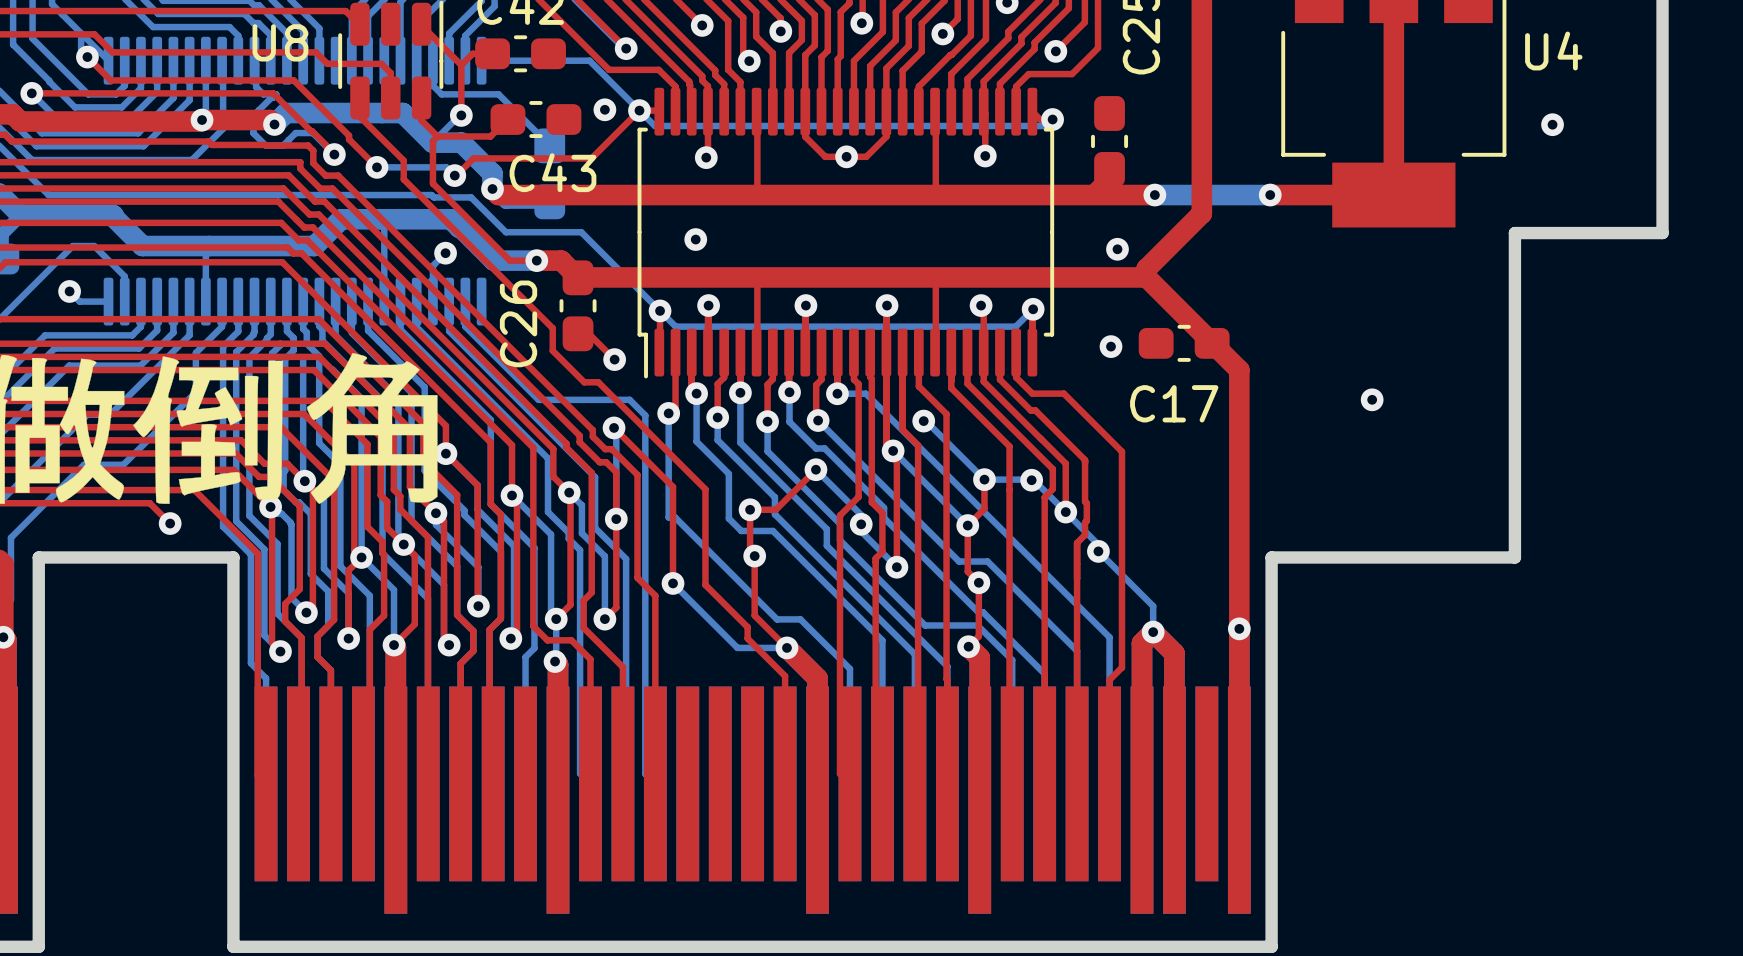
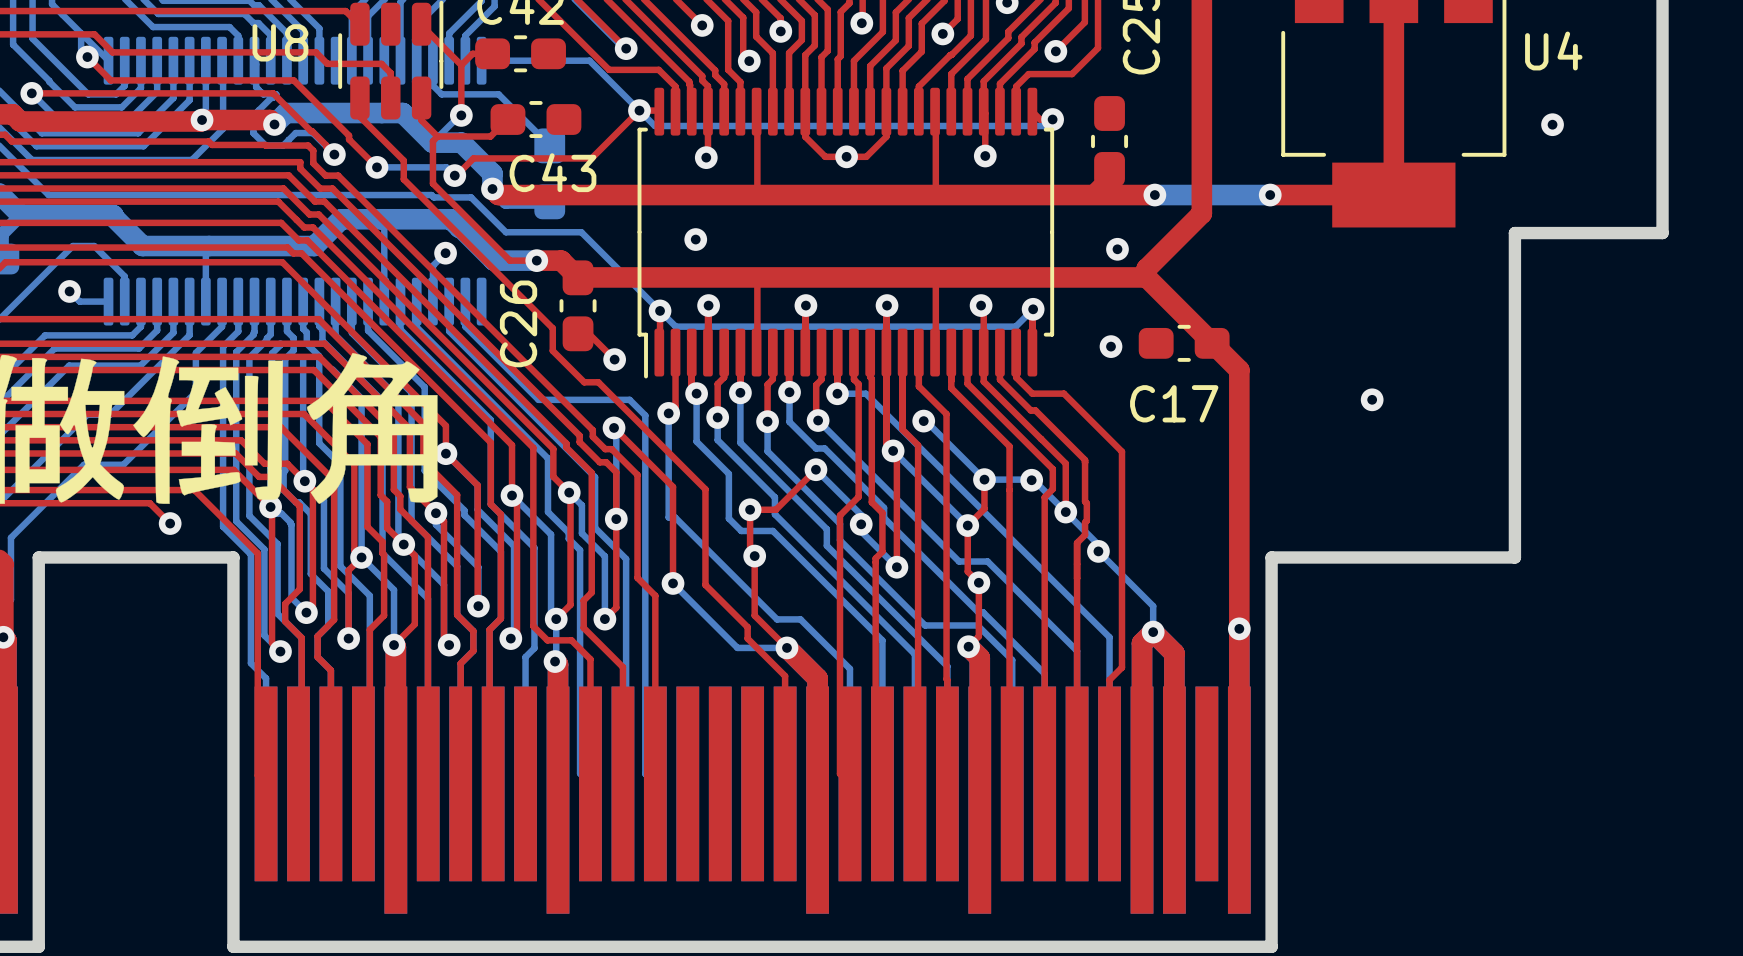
via: (604, 109) -> none

